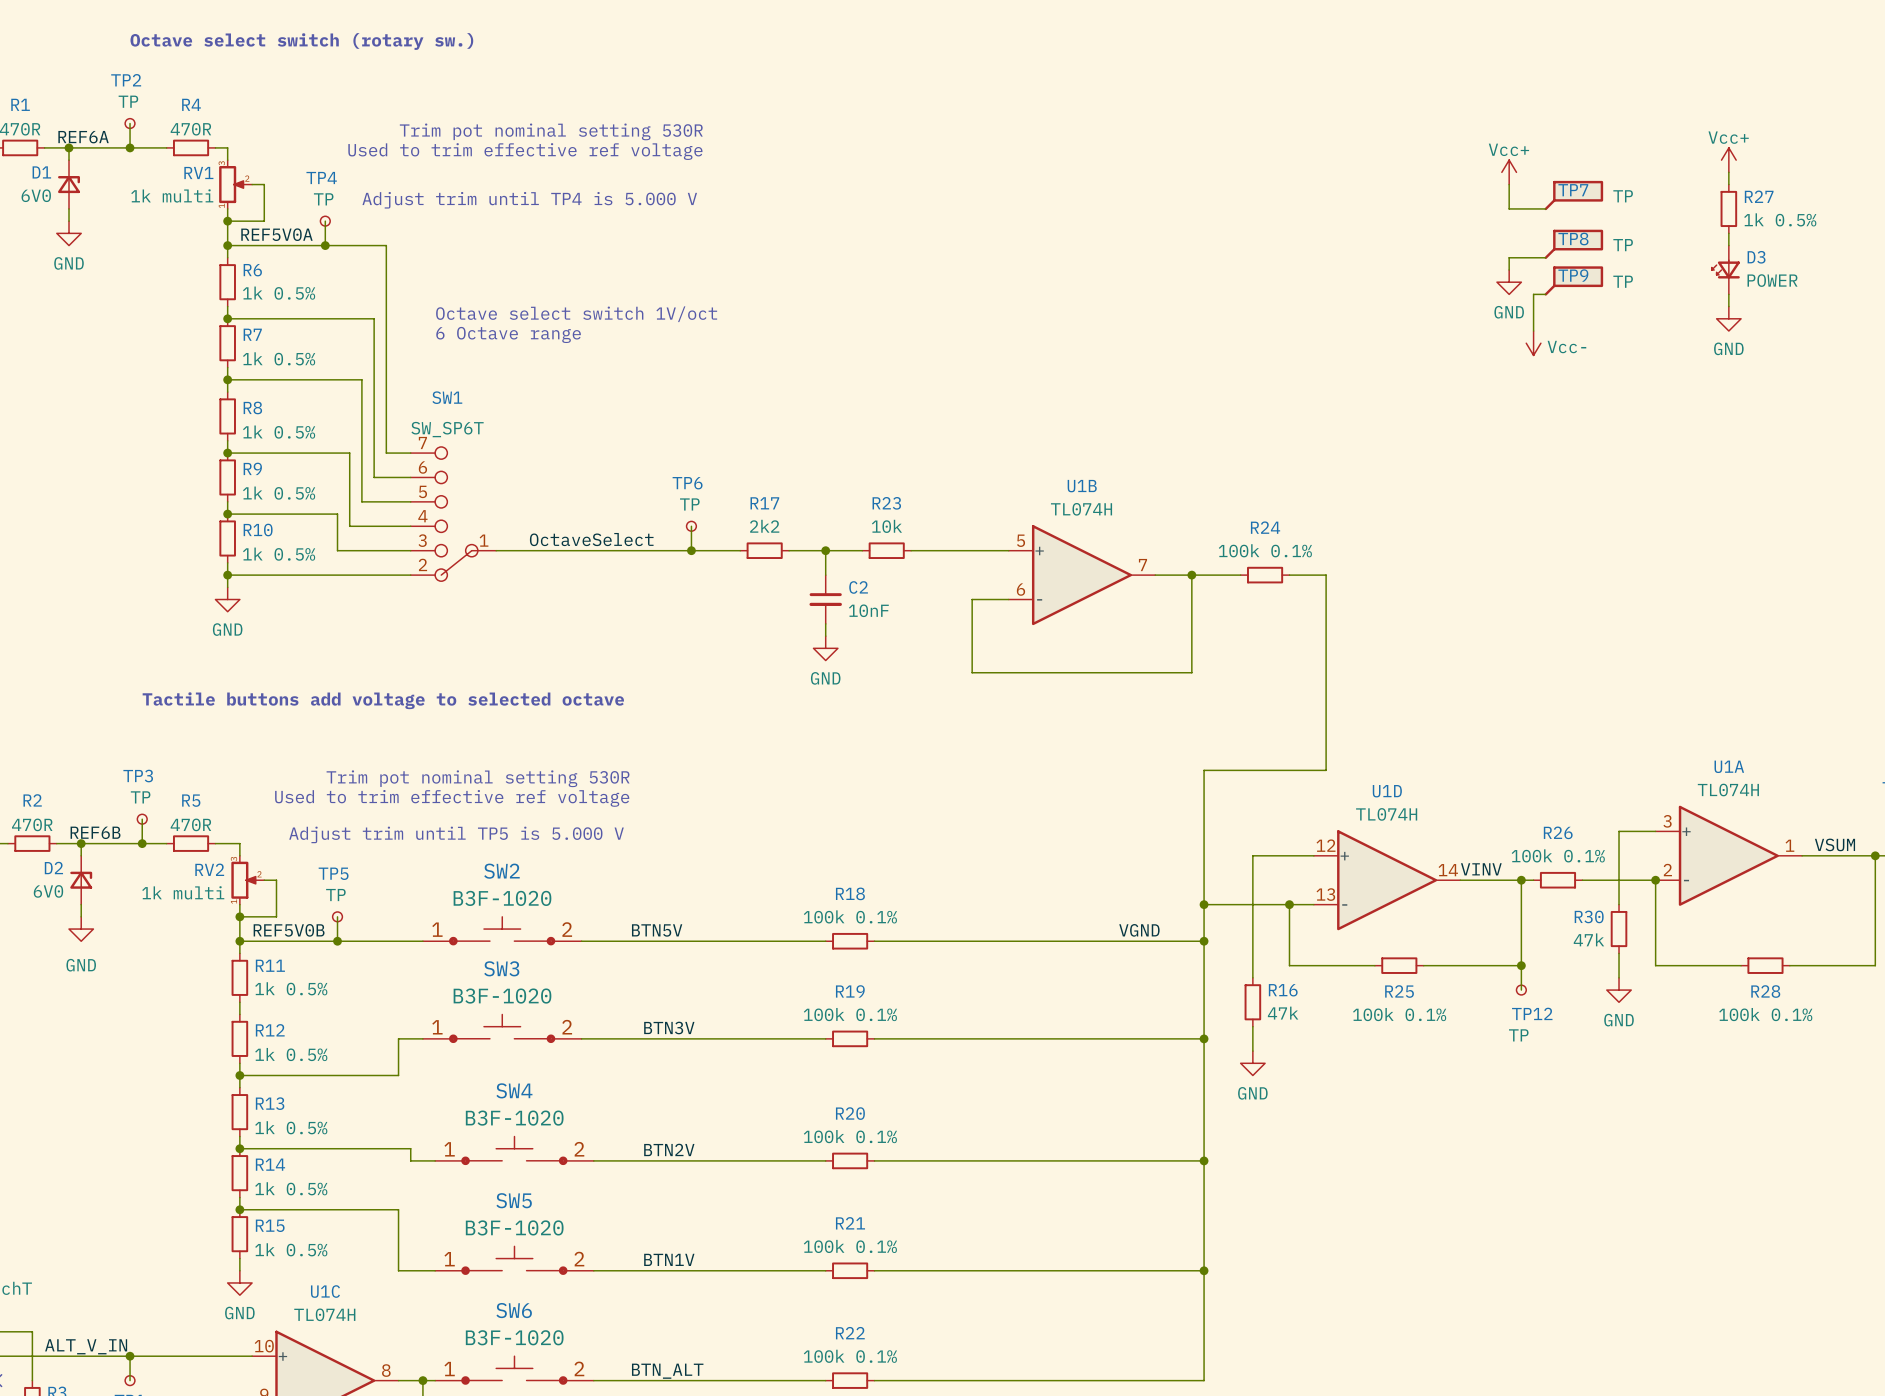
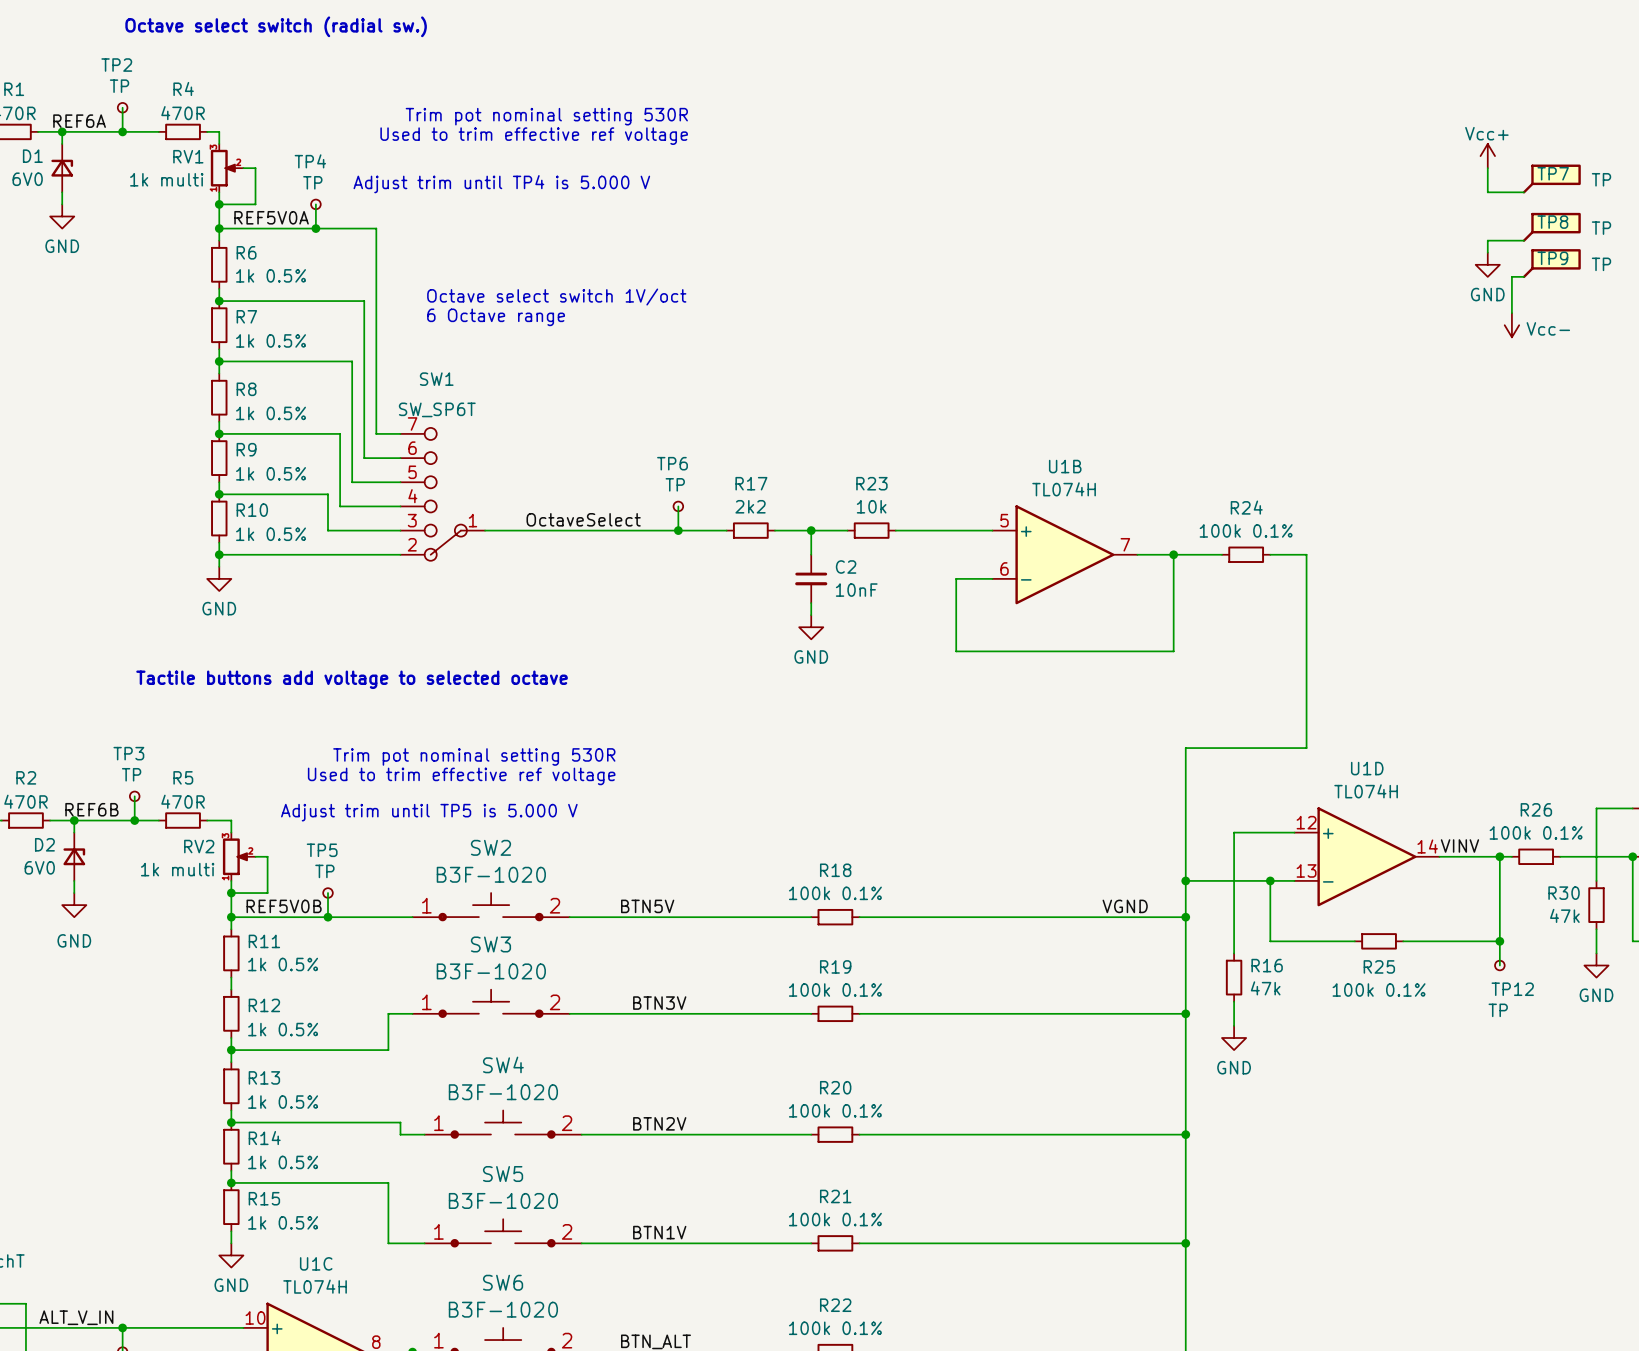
text: Octave select switch (rotary sw.) (301, 41) -> Octave select switch (radial sw.) (276, 26)

